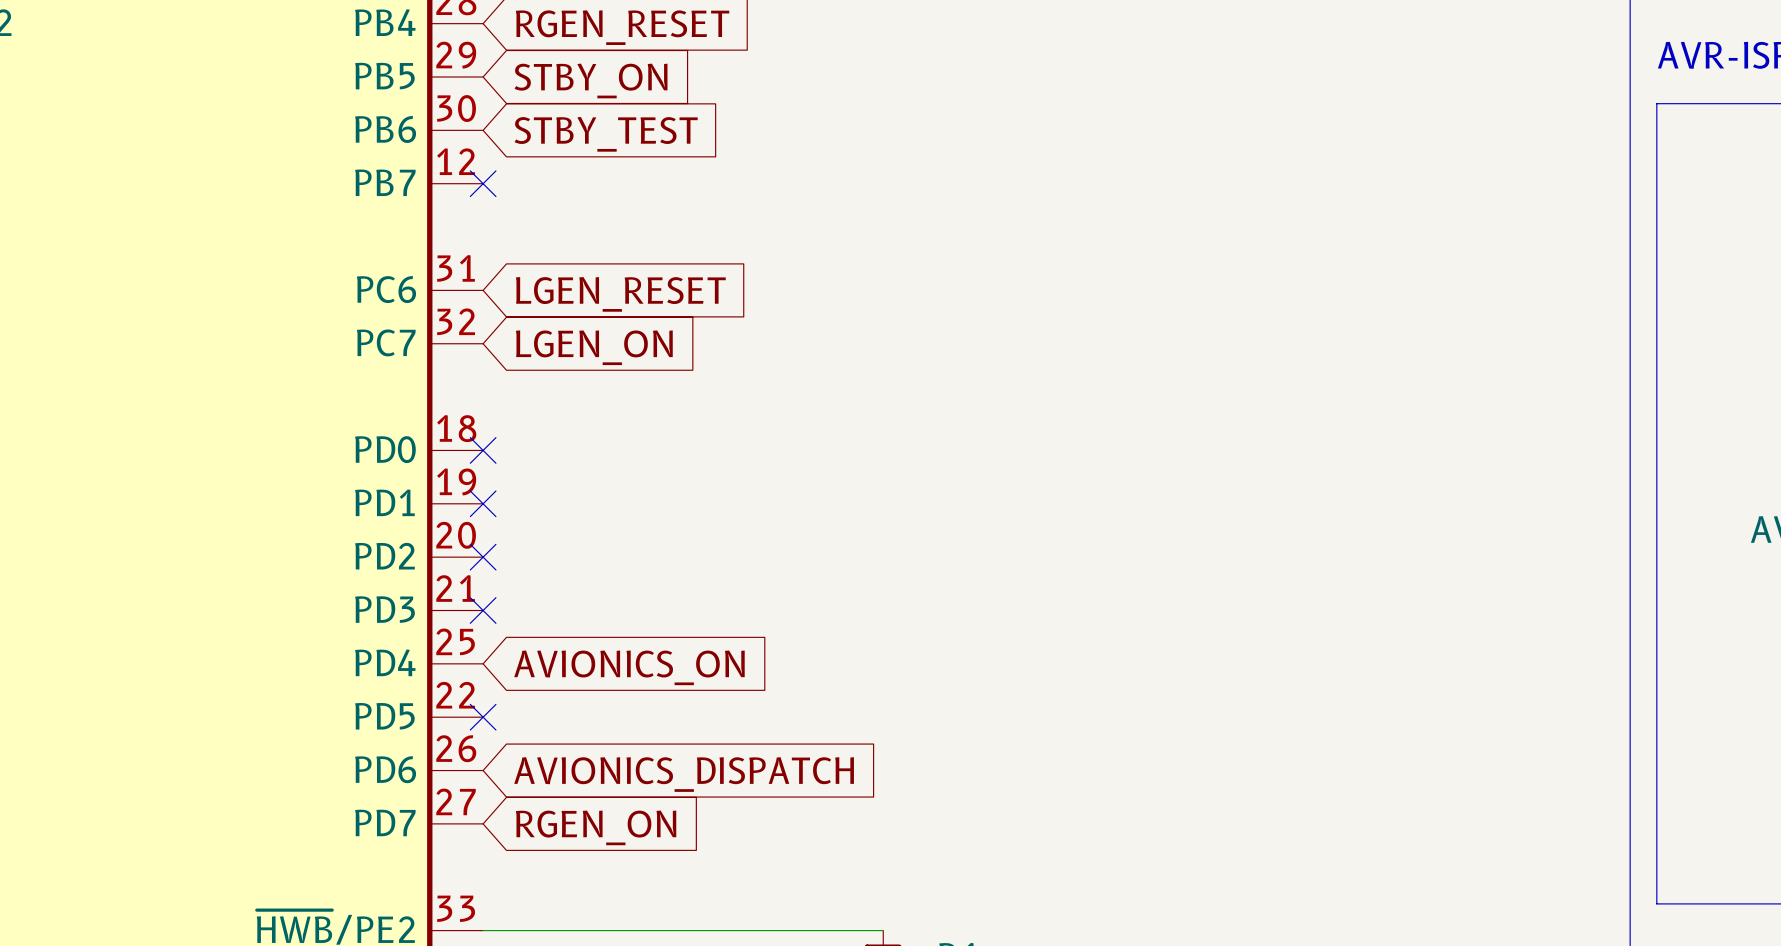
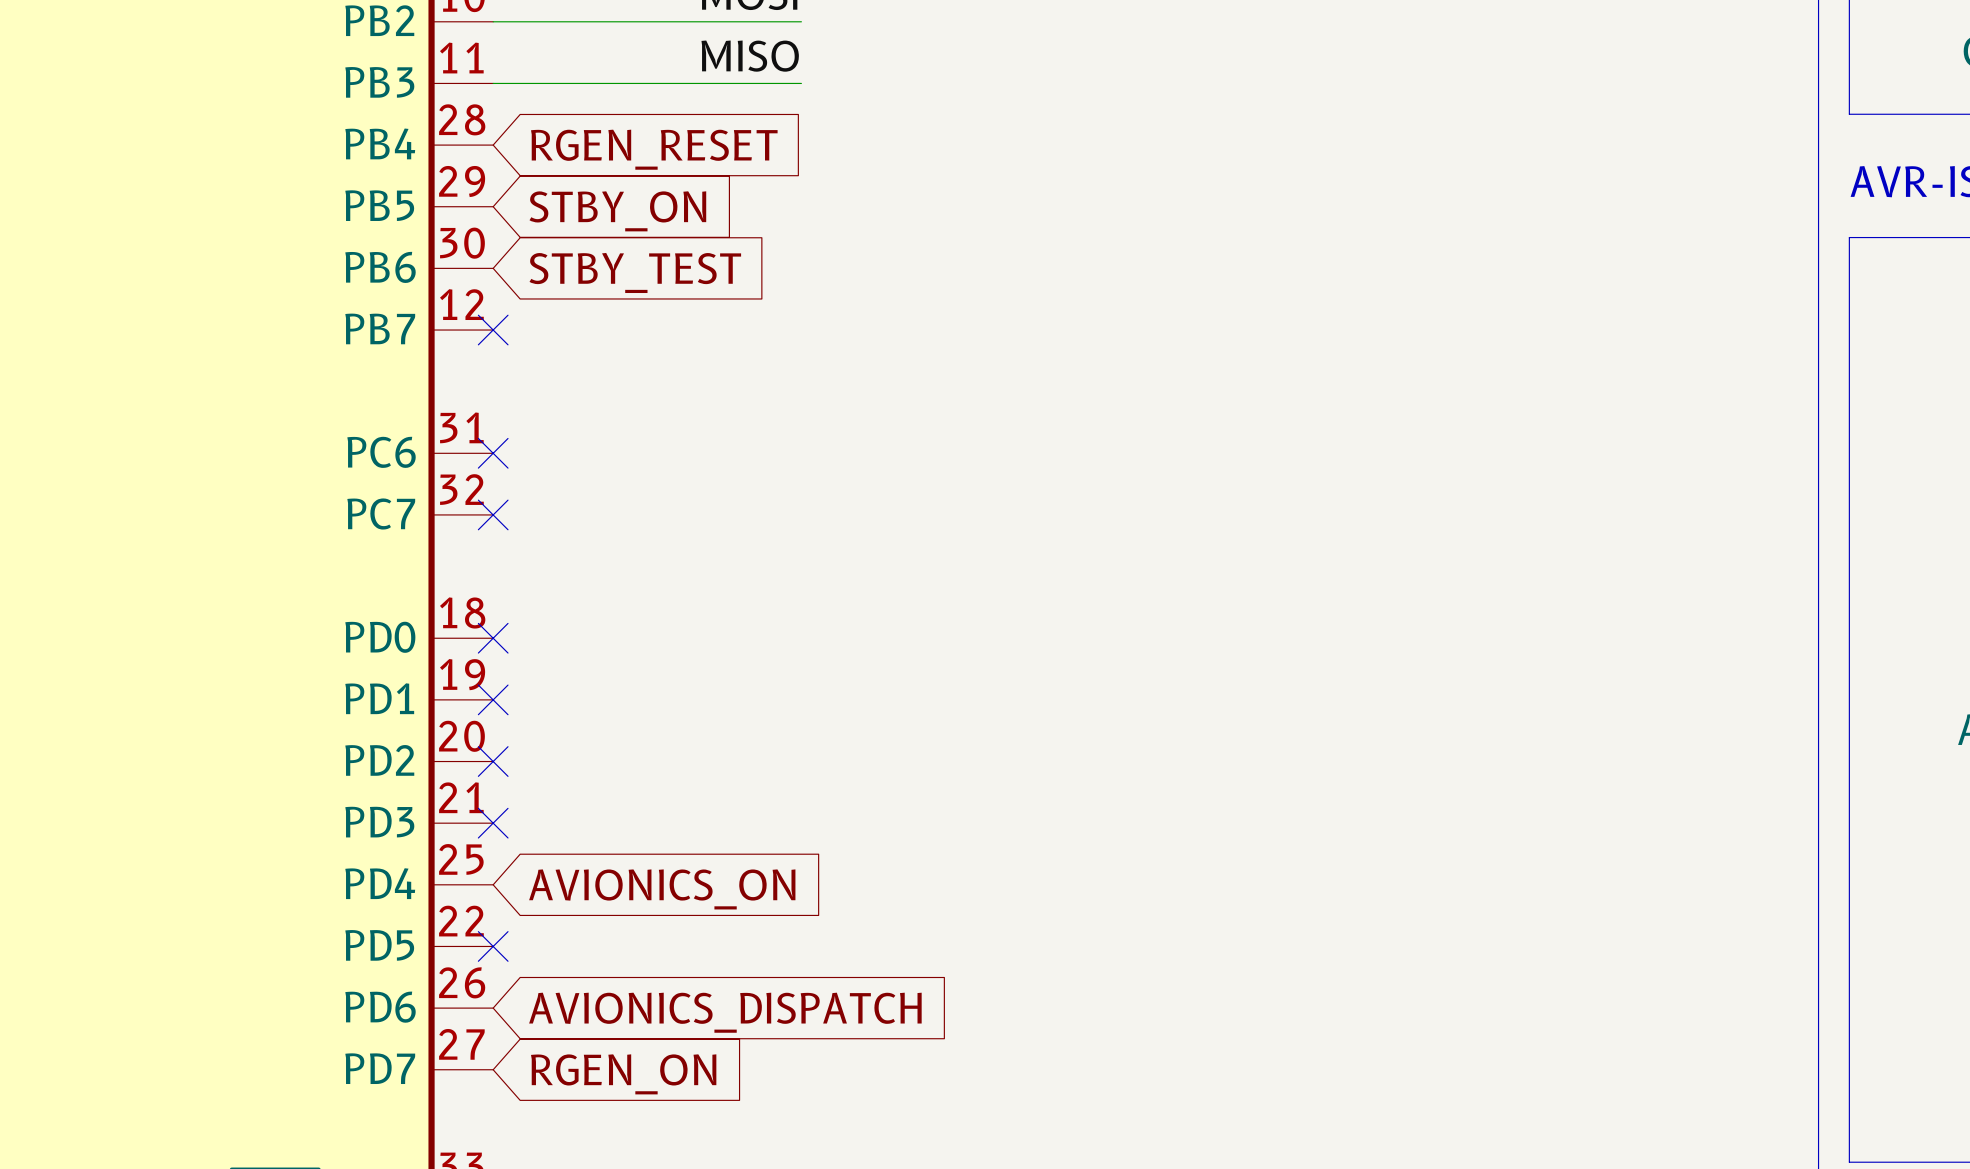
no-connect mark: none -> (493, 453)
global label: LGEN_RESET (620, 294) -> none
no-connect mark: none -> (493, 514)
global label: LGEN_ON (594, 347) -> none

